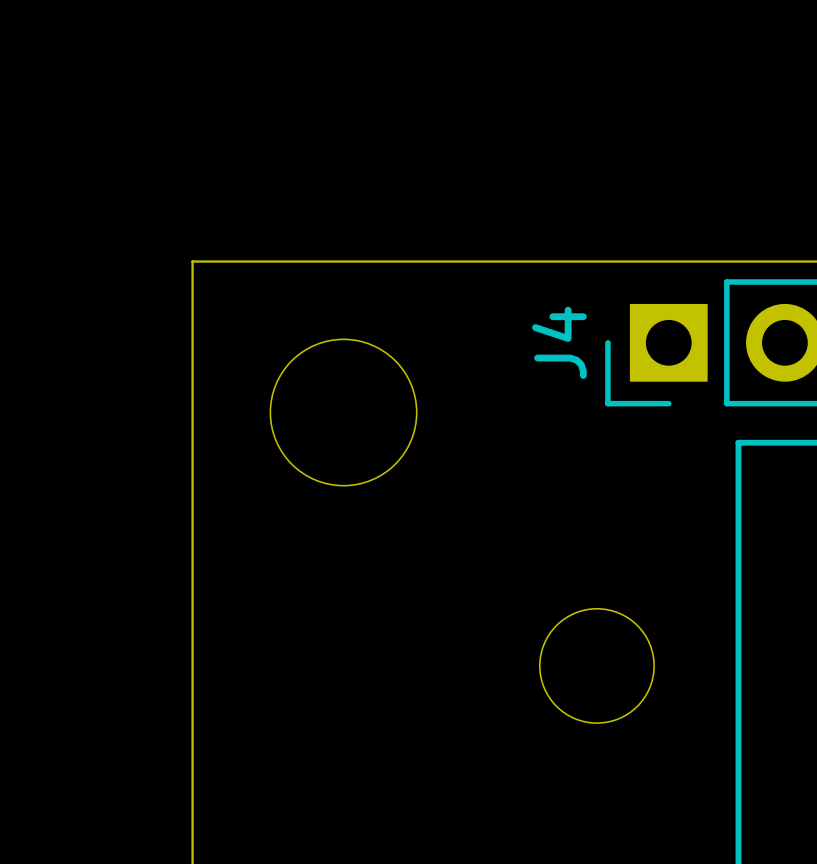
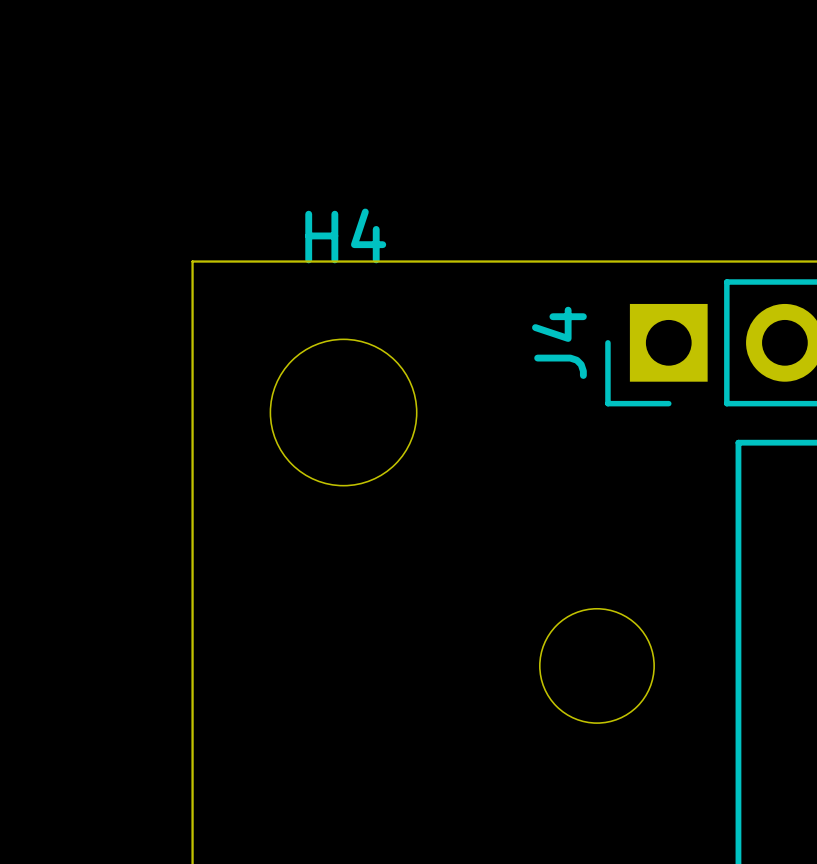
H4 name: none -> H4 (345, 235)

